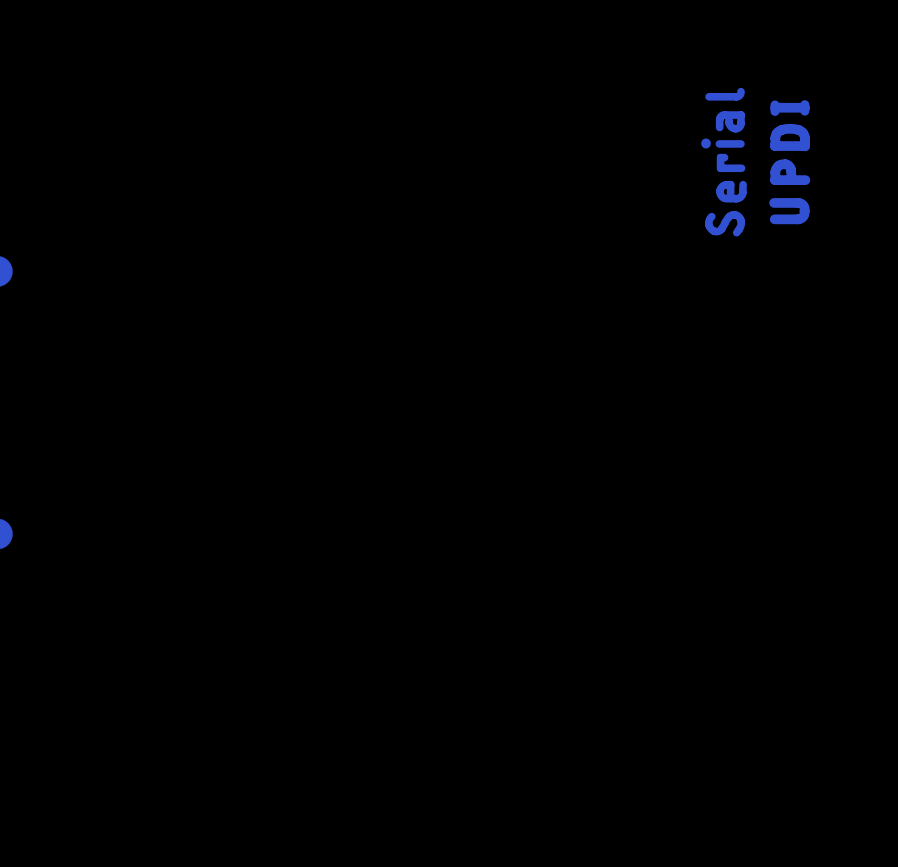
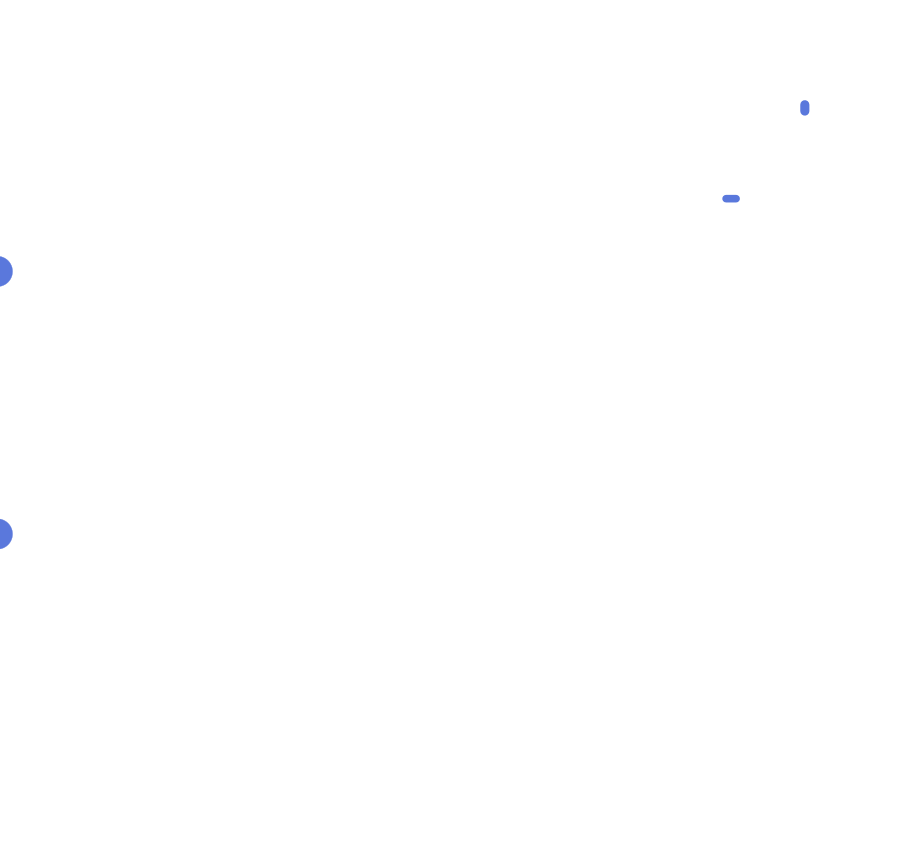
track: (740, 91) (736, 96) (709, 96) -> none
track: (775, 105) (775, 111) -> none
track: (804, 107) (775, 107) -> none
track: (740, 115) (740, 124) (736, 128) (730, 125) (729, 116) -> none
track: (741, 115) (721, 115) (719, 127) -> none
track: (781, 129) (792, 128) (800, 131) (804, 136) (805, 146) -> none
track: (782, 129) (776, 134) (775, 145) -> none
track: (740, 143) (719, 143) -> none
track: (804, 146) (775, 146) -> none
track: (724, 157) (720, 157) (720, 168) (741, 168) -> none
track: (791, 178) (790, 167) (783, 164) (776, 168) (775, 180) -> none
track: (805, 180) (775, 180) -> none
track: (743, 184) (742, 195) (735, 198) -> none
track: (730, 198) (730, 184) (724, 185) (720, 188) (720, 194) (724, 198) -> none
track: (774, 202) (799, 203) (803, 206) (804, 211) -> none
track: (804, 211) (803, 216) (799, 219) (774, 219) -> none
track: (711, 216) (709, 220) (709, 226) (716, 231) (721, 229) (729, 216) (737, 215) (741, 223) (736, 232) -> none

